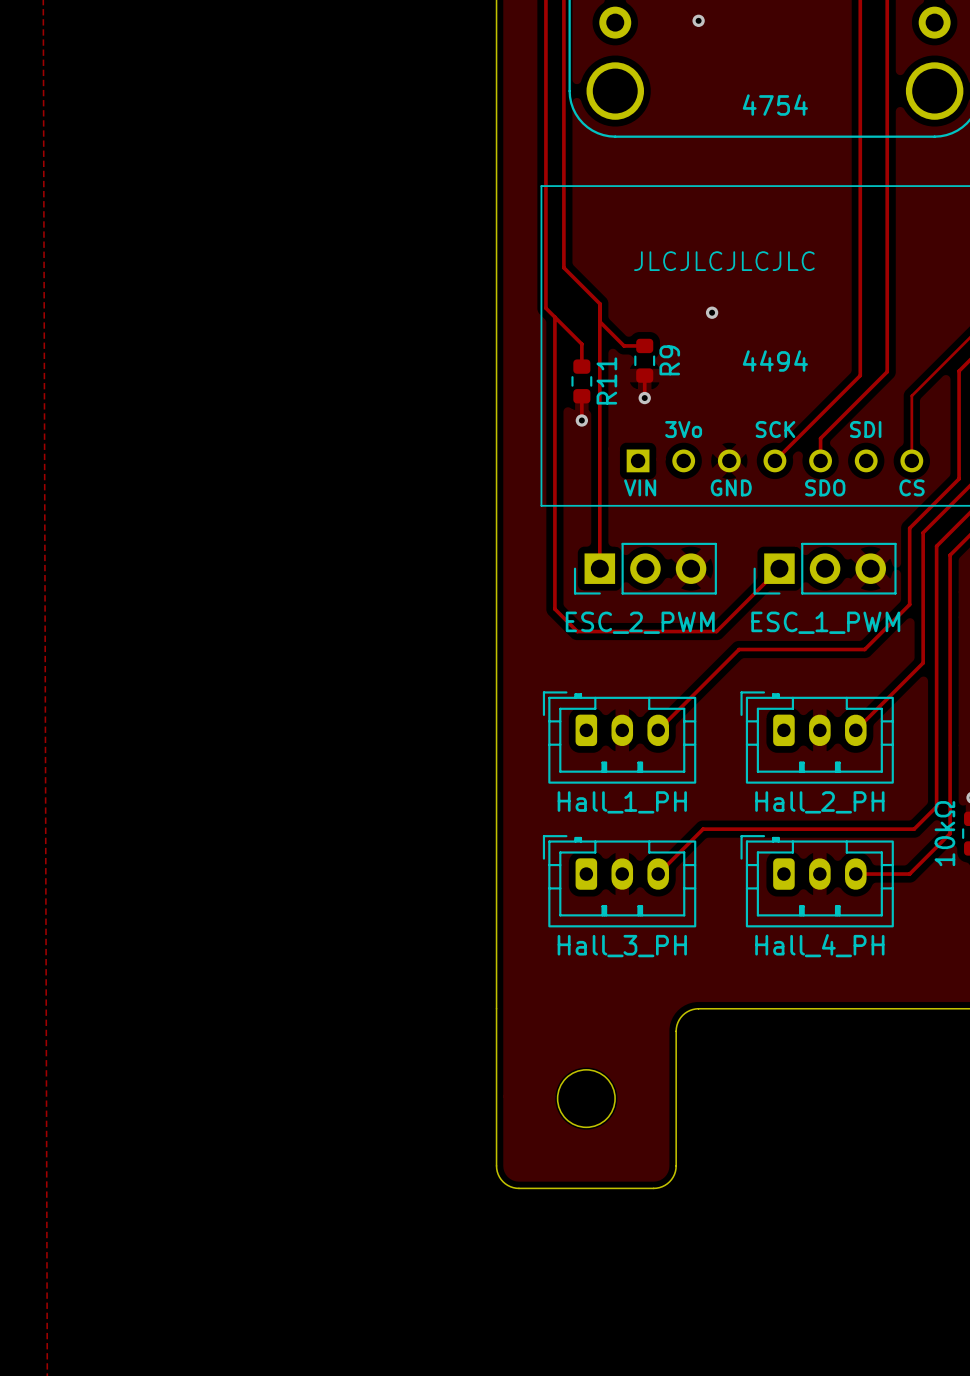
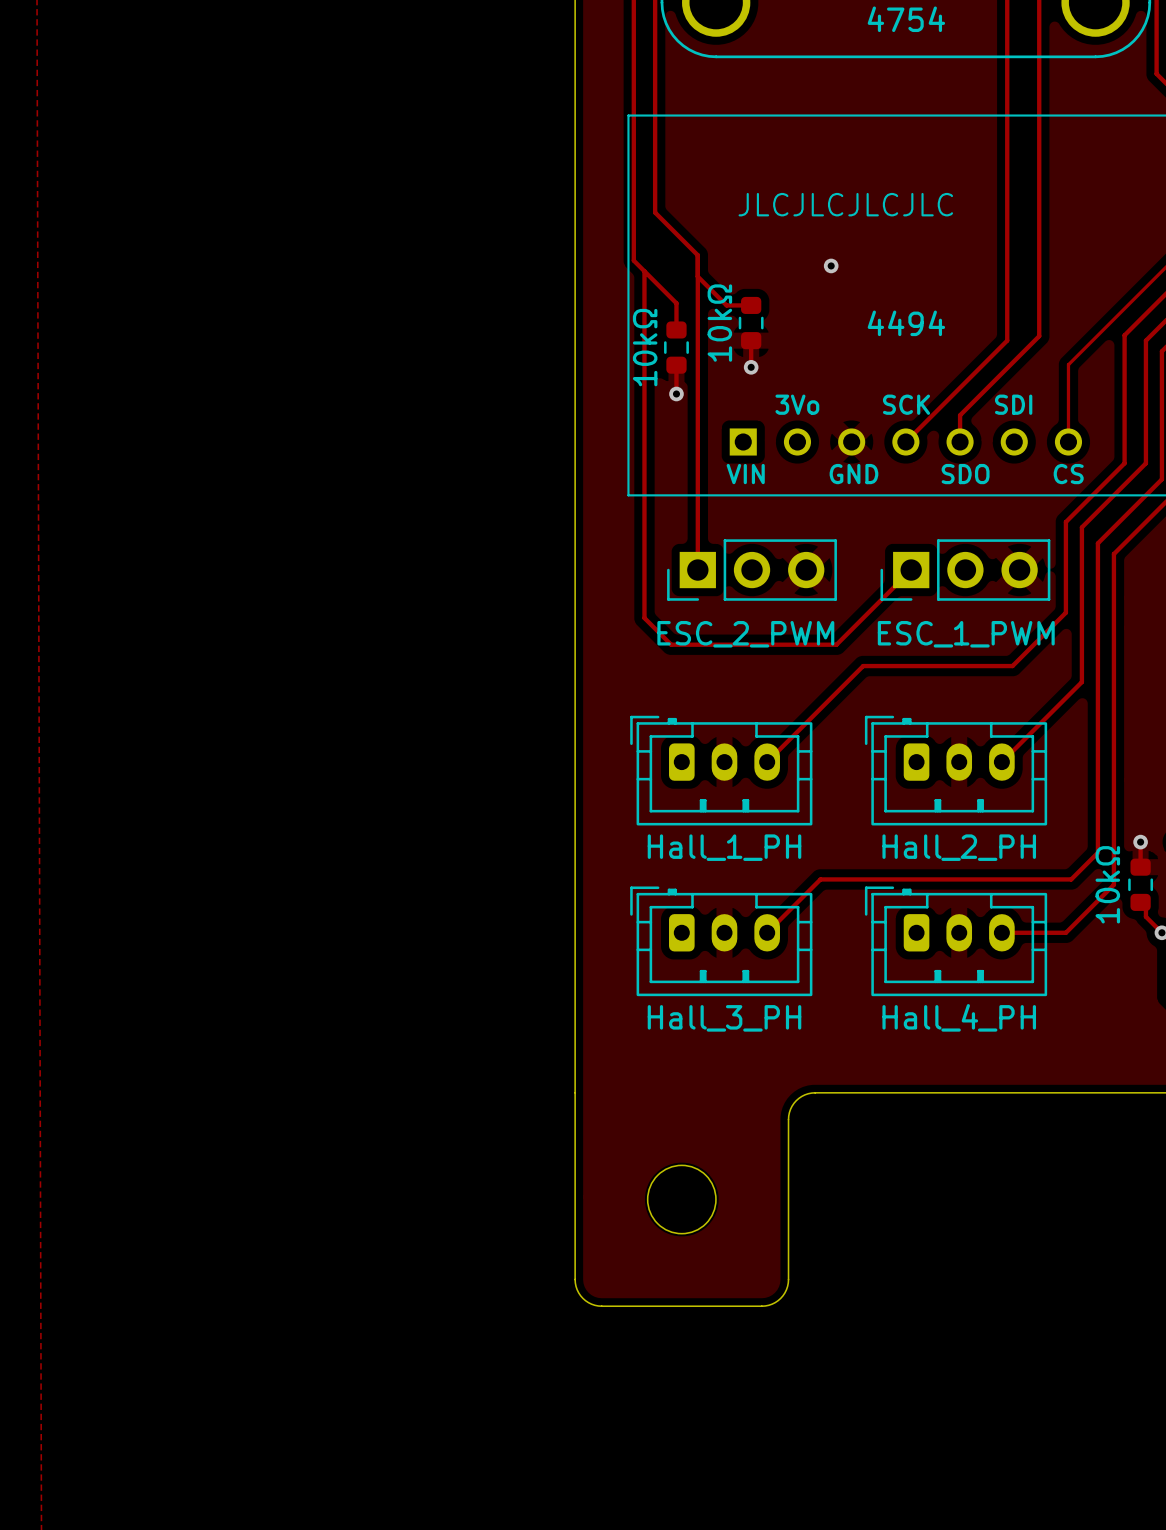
R9 value: none -> 10kΩ (719, 323)
R9 name: R9 (669, 360) -> none
R11 name: R11 (606, 380) -> none
R11 value: none -> 10kΩ (645, 347)

